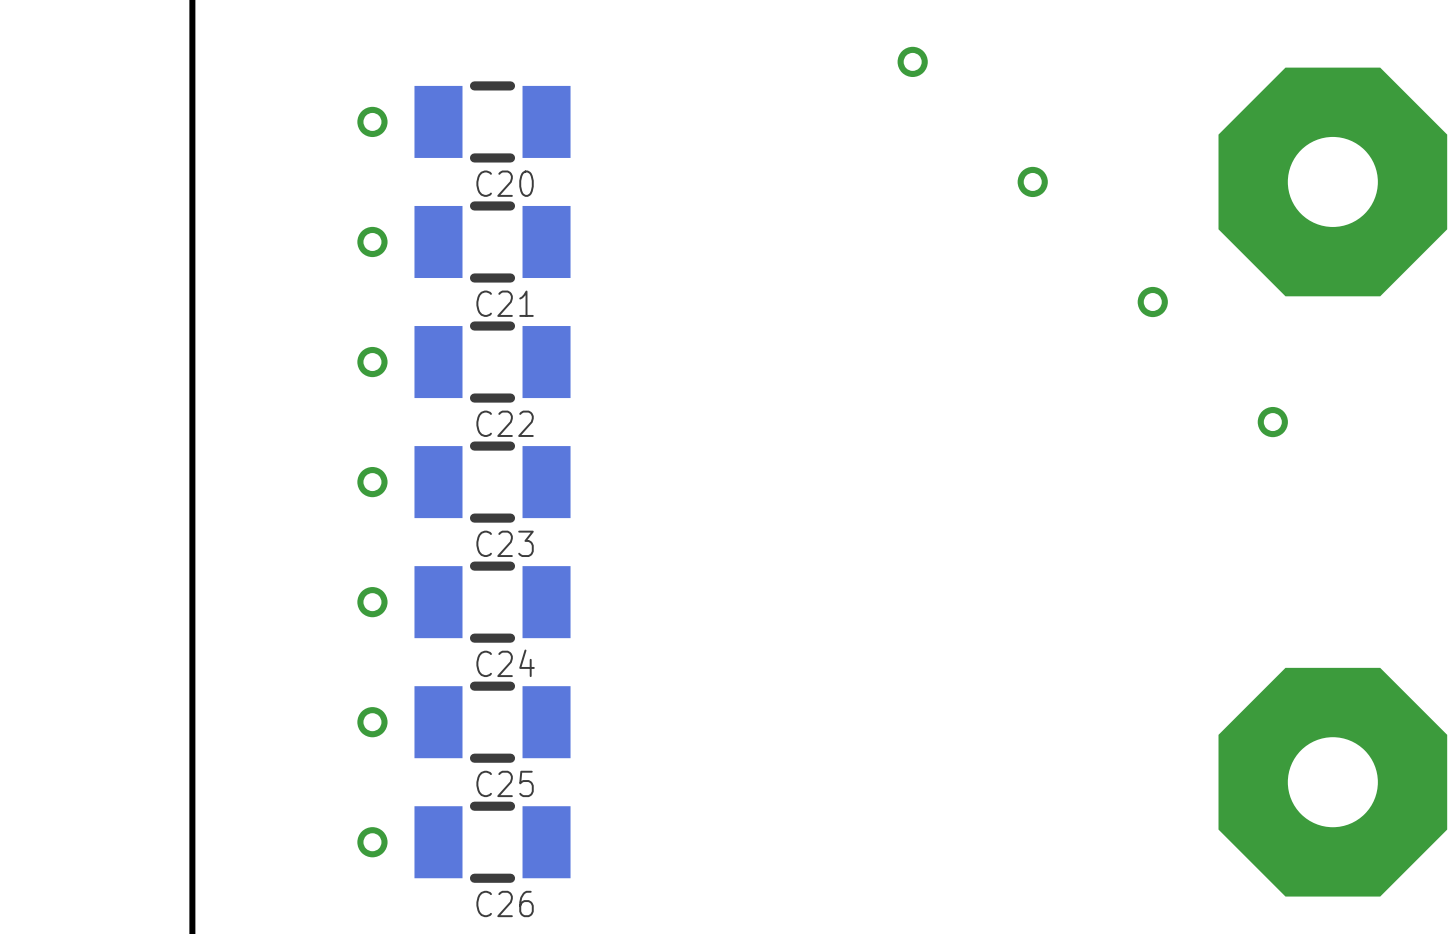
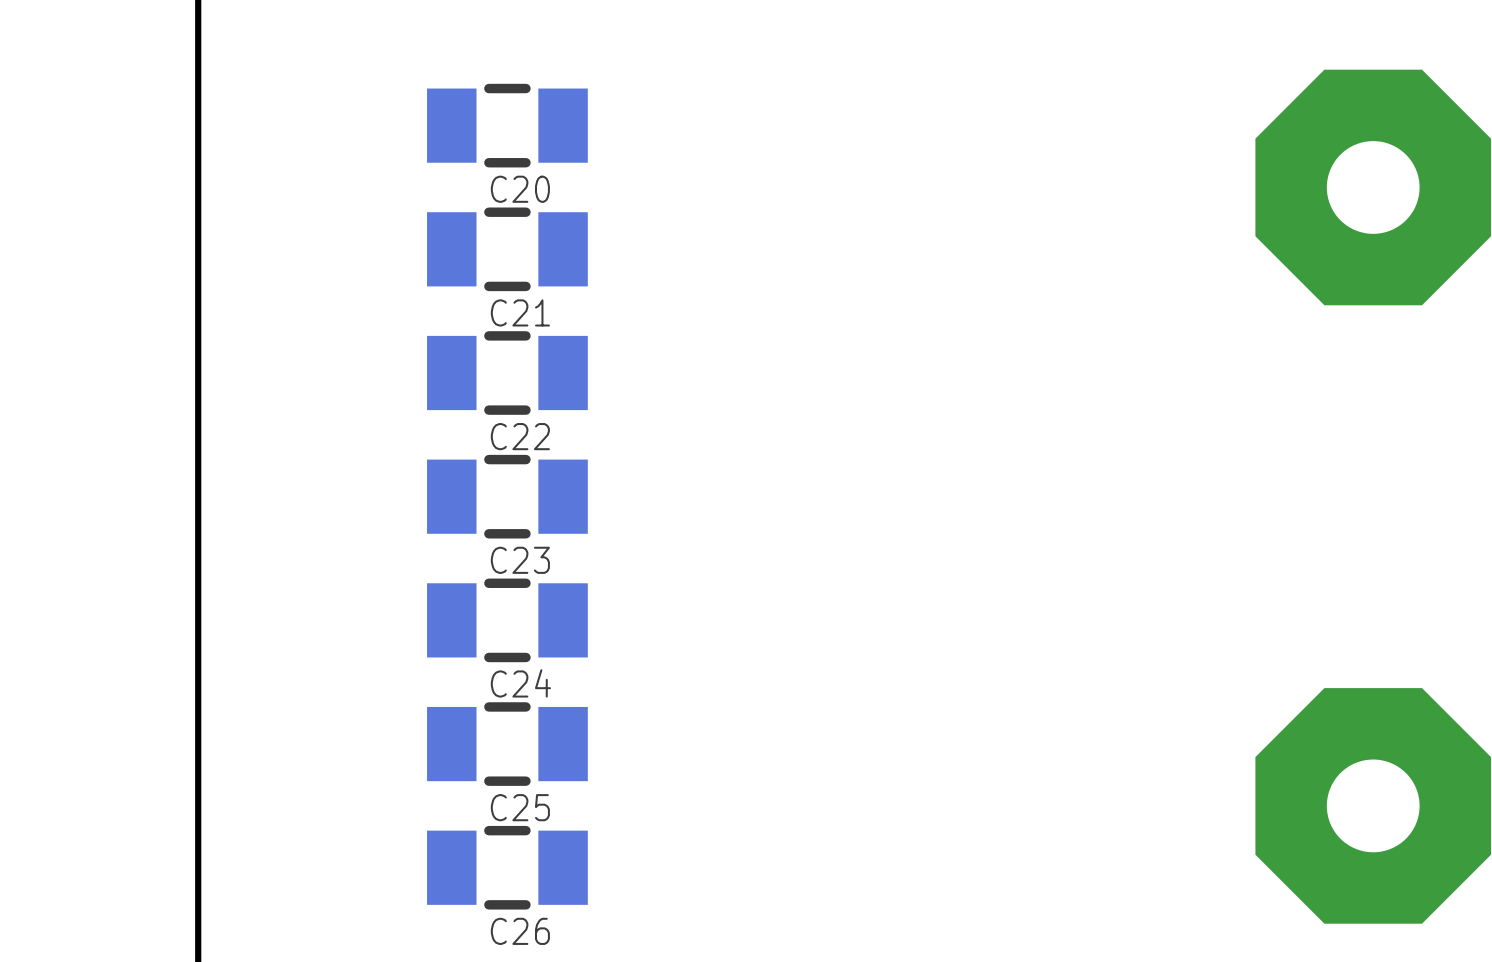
via: (912, 61) -> none
via: (372, 121) -> none
via: (1032, 181) -> none
via: (372, 241) -> none
via: (1152, 302) -> none
via: (372, 362) -> none
via: (1272, 422) -> none
via: (372, 482) -> none
via: (372, 602) -> none
via: (372, 722) -> none
via: (372, 842) -> none

